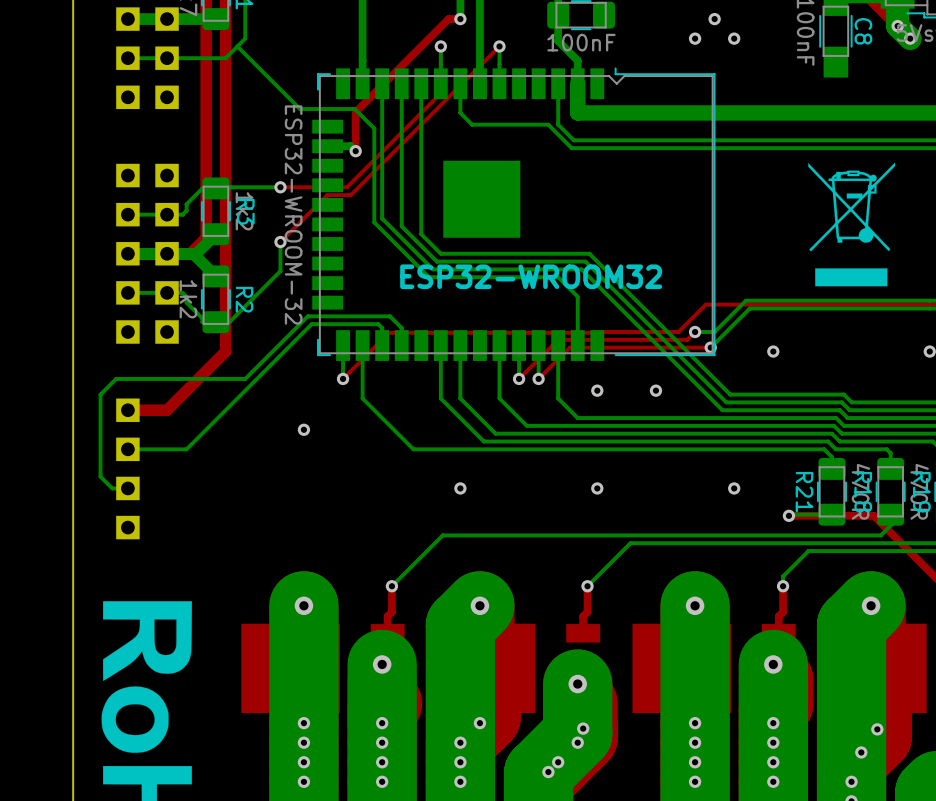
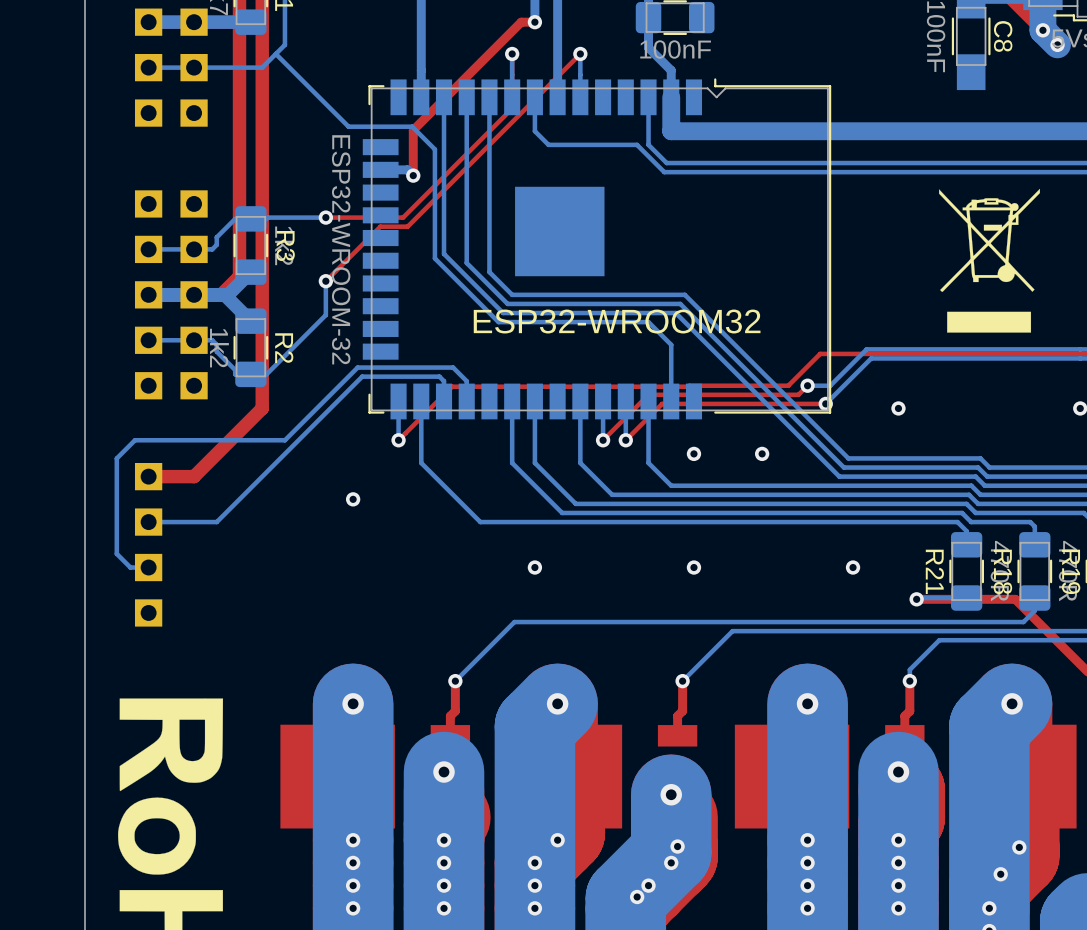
via: (714, 19) -> none
via: (695, 38) -> none
via: (734, 38) -> none

